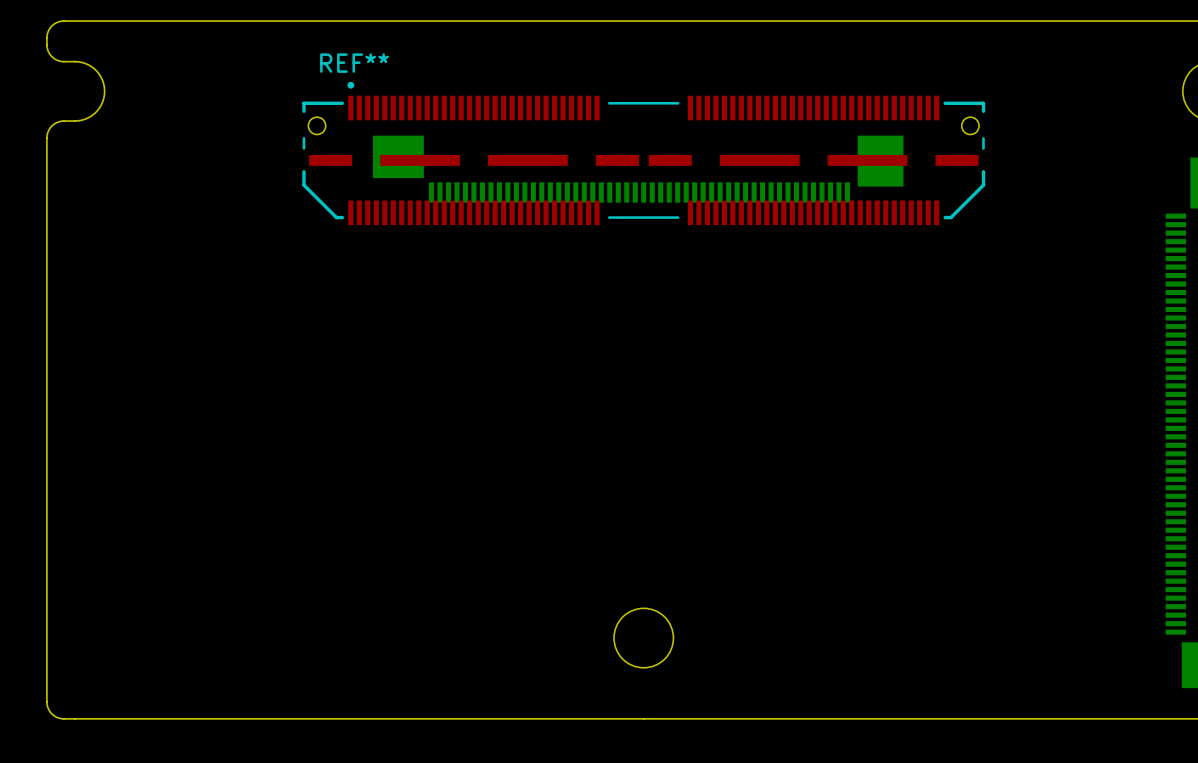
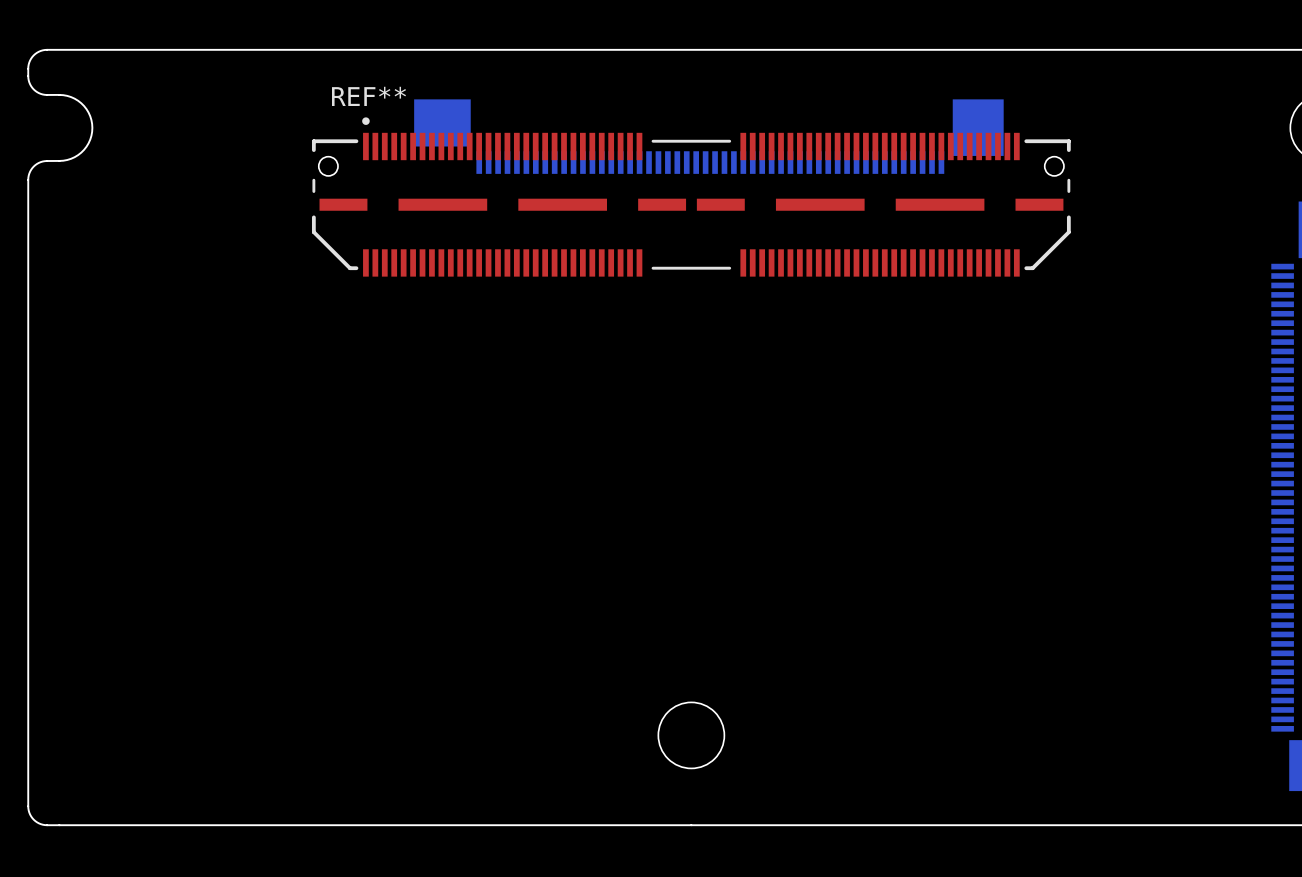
part position: (638, 169) -> (708, 136)

